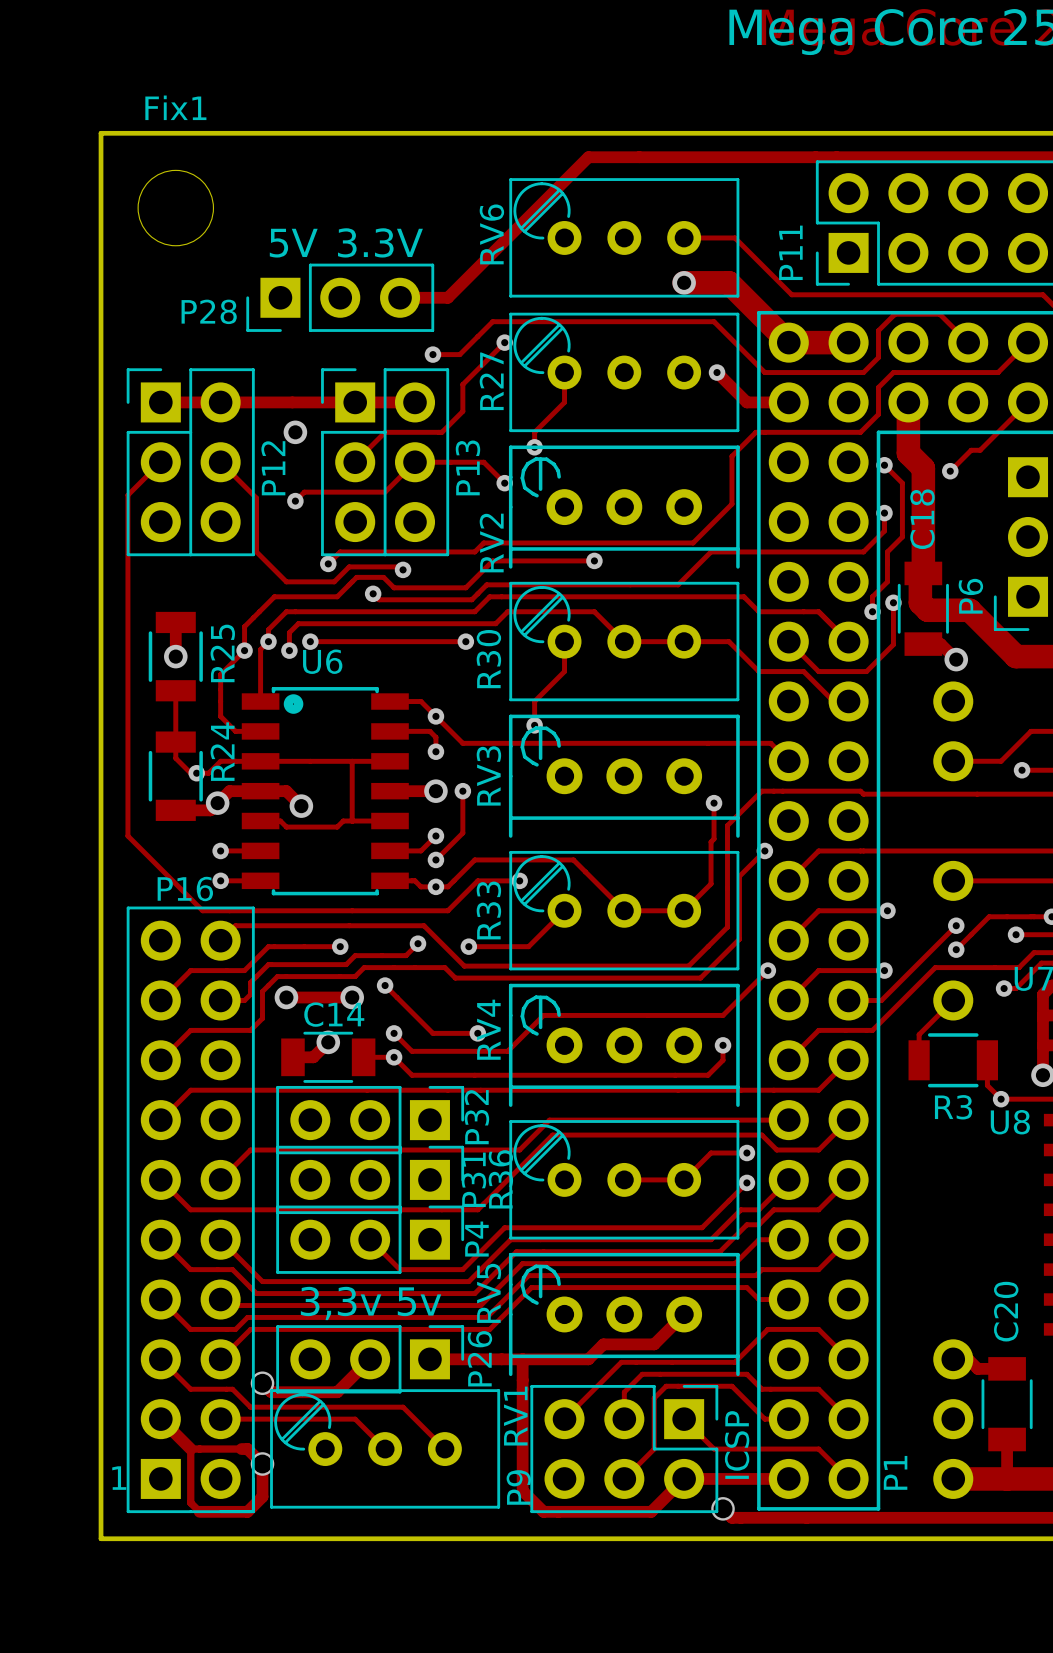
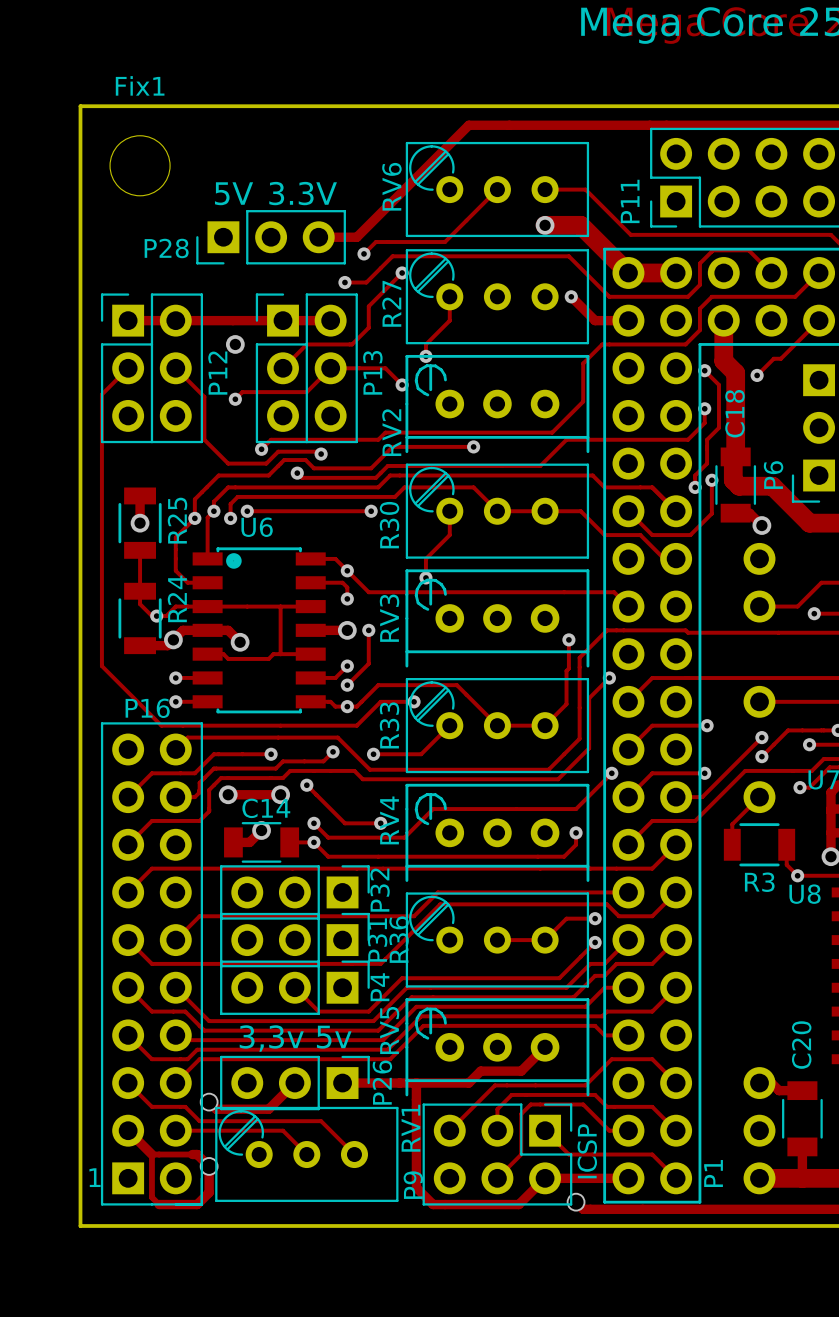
track: none -> (497, 189) (445, 242) (375, 242) (364, 253)
via: none -> (364, 253)

